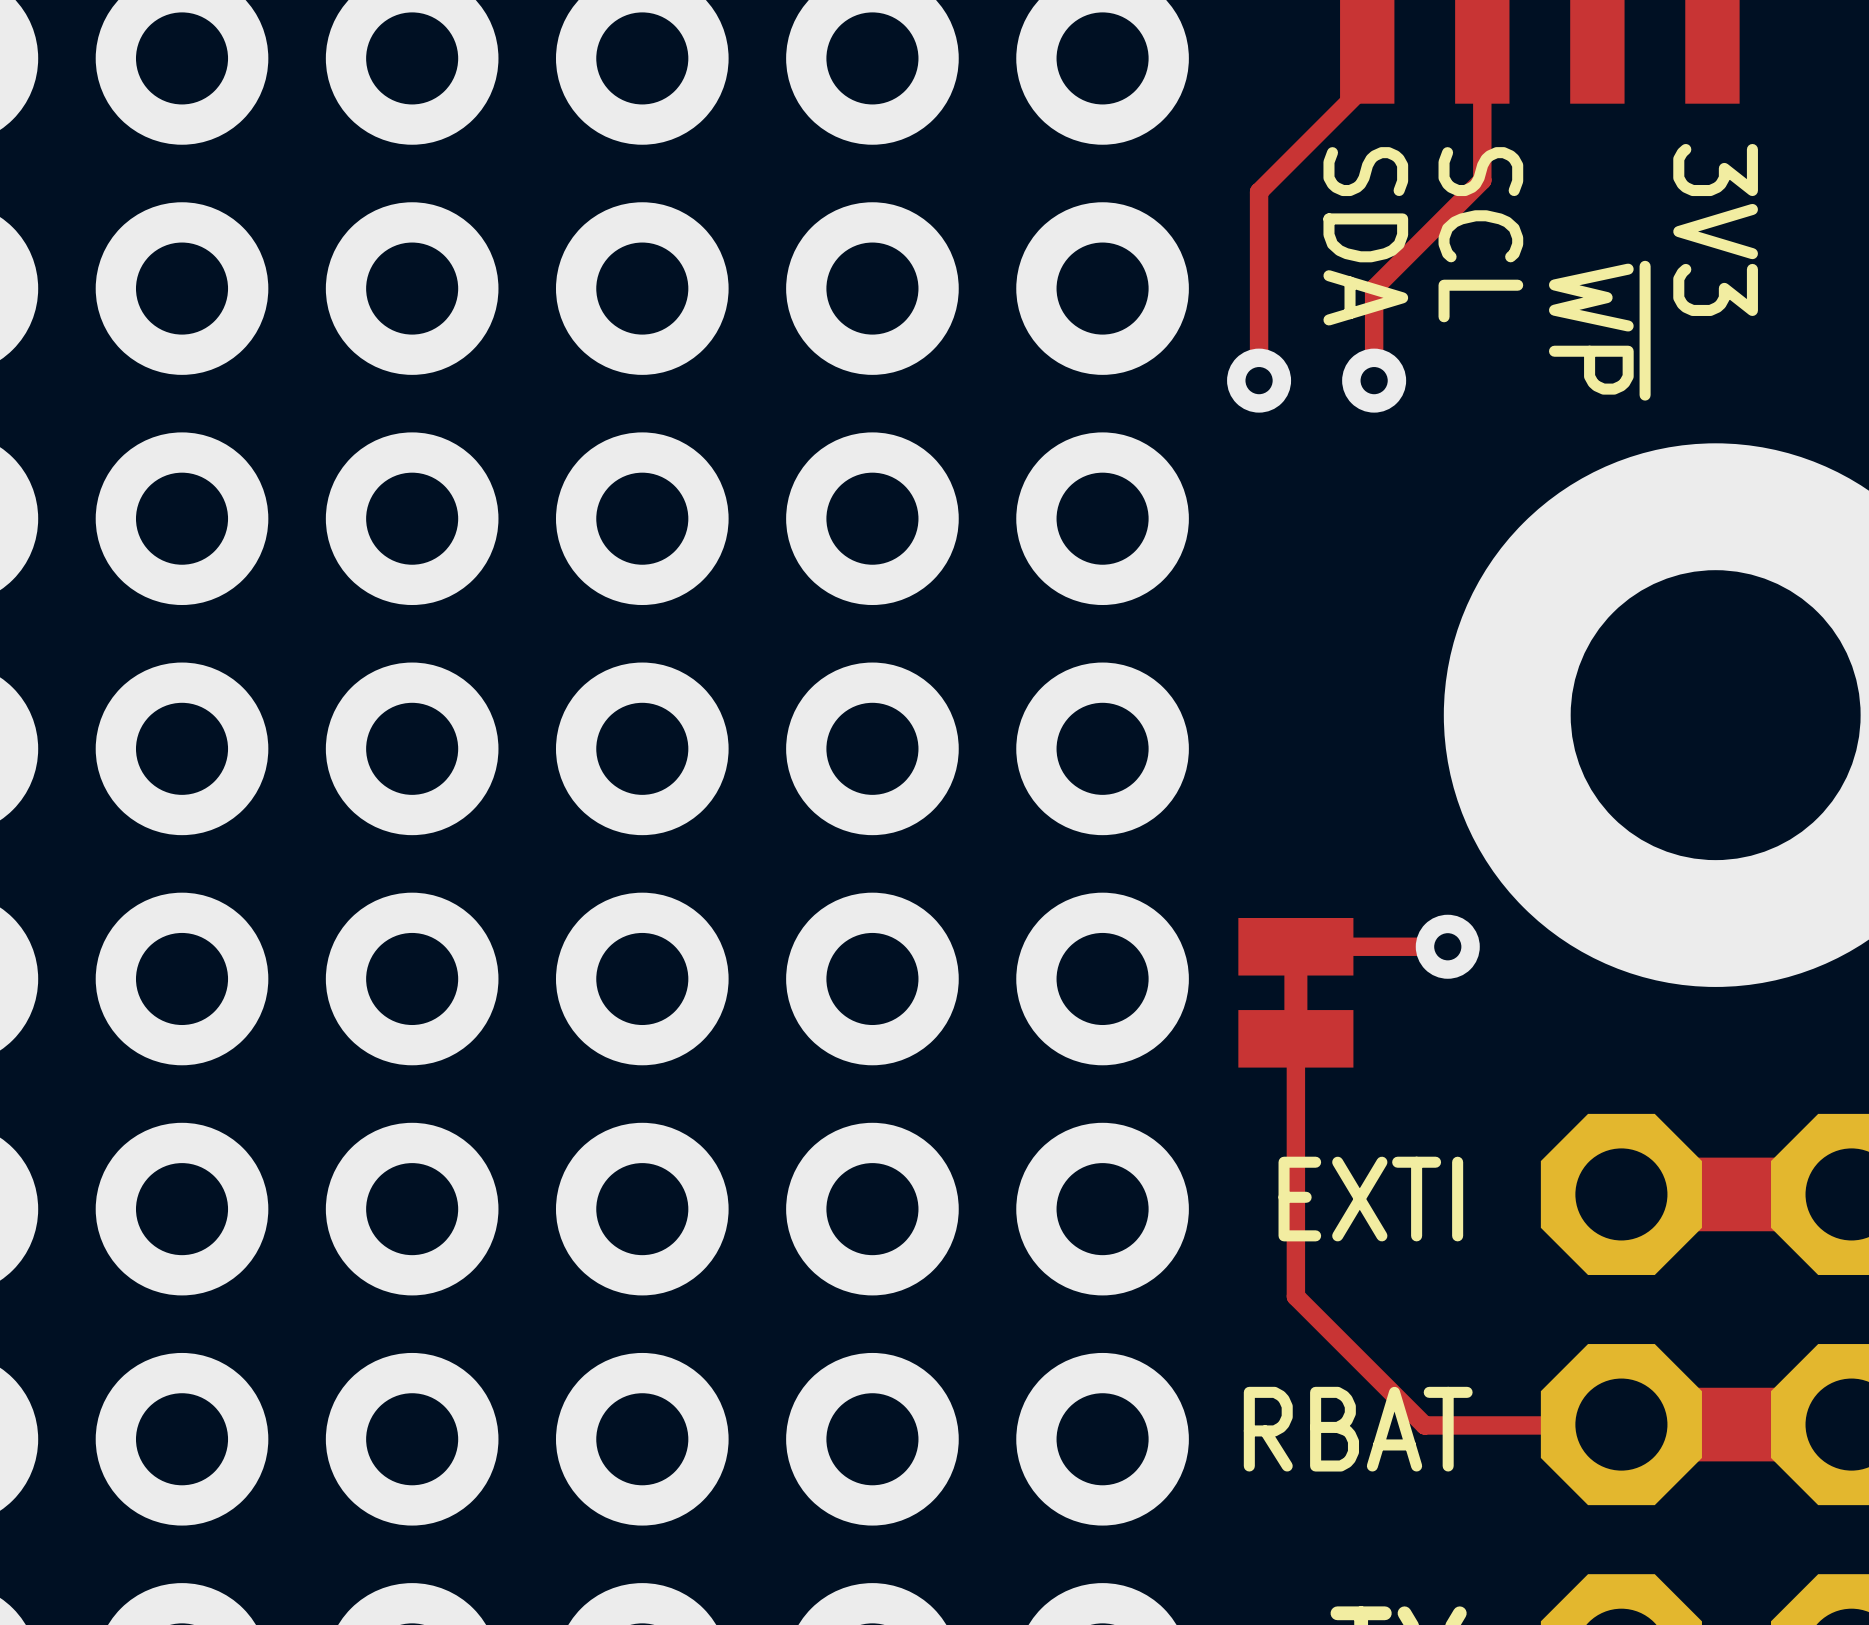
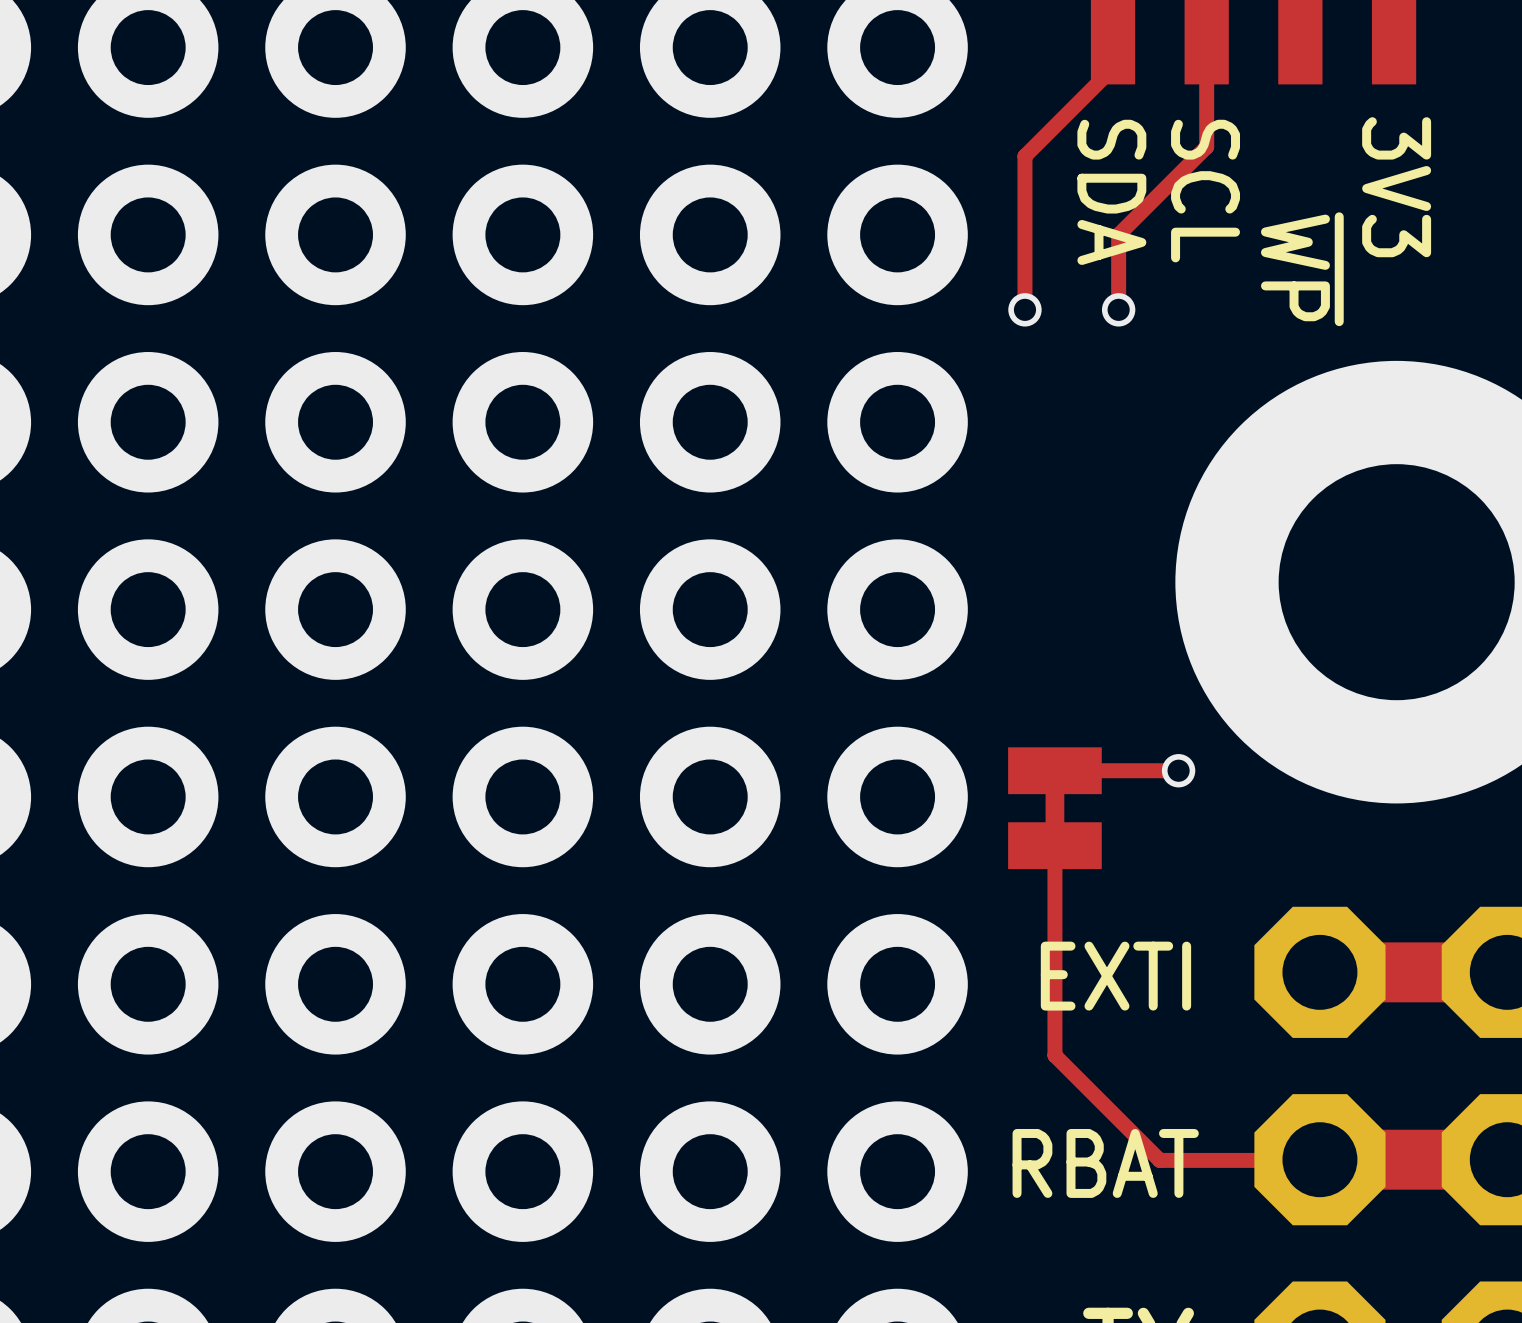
via size: [1227, 348, 1292, 413] -> [1008, 293, 1042, 327]
via size: [1342, 348, 1407, 413] -> [1101, 293, 1136, 327]
via size: [1415, 914, 1480, 979] -> [1161, 754, 1196, 788]

